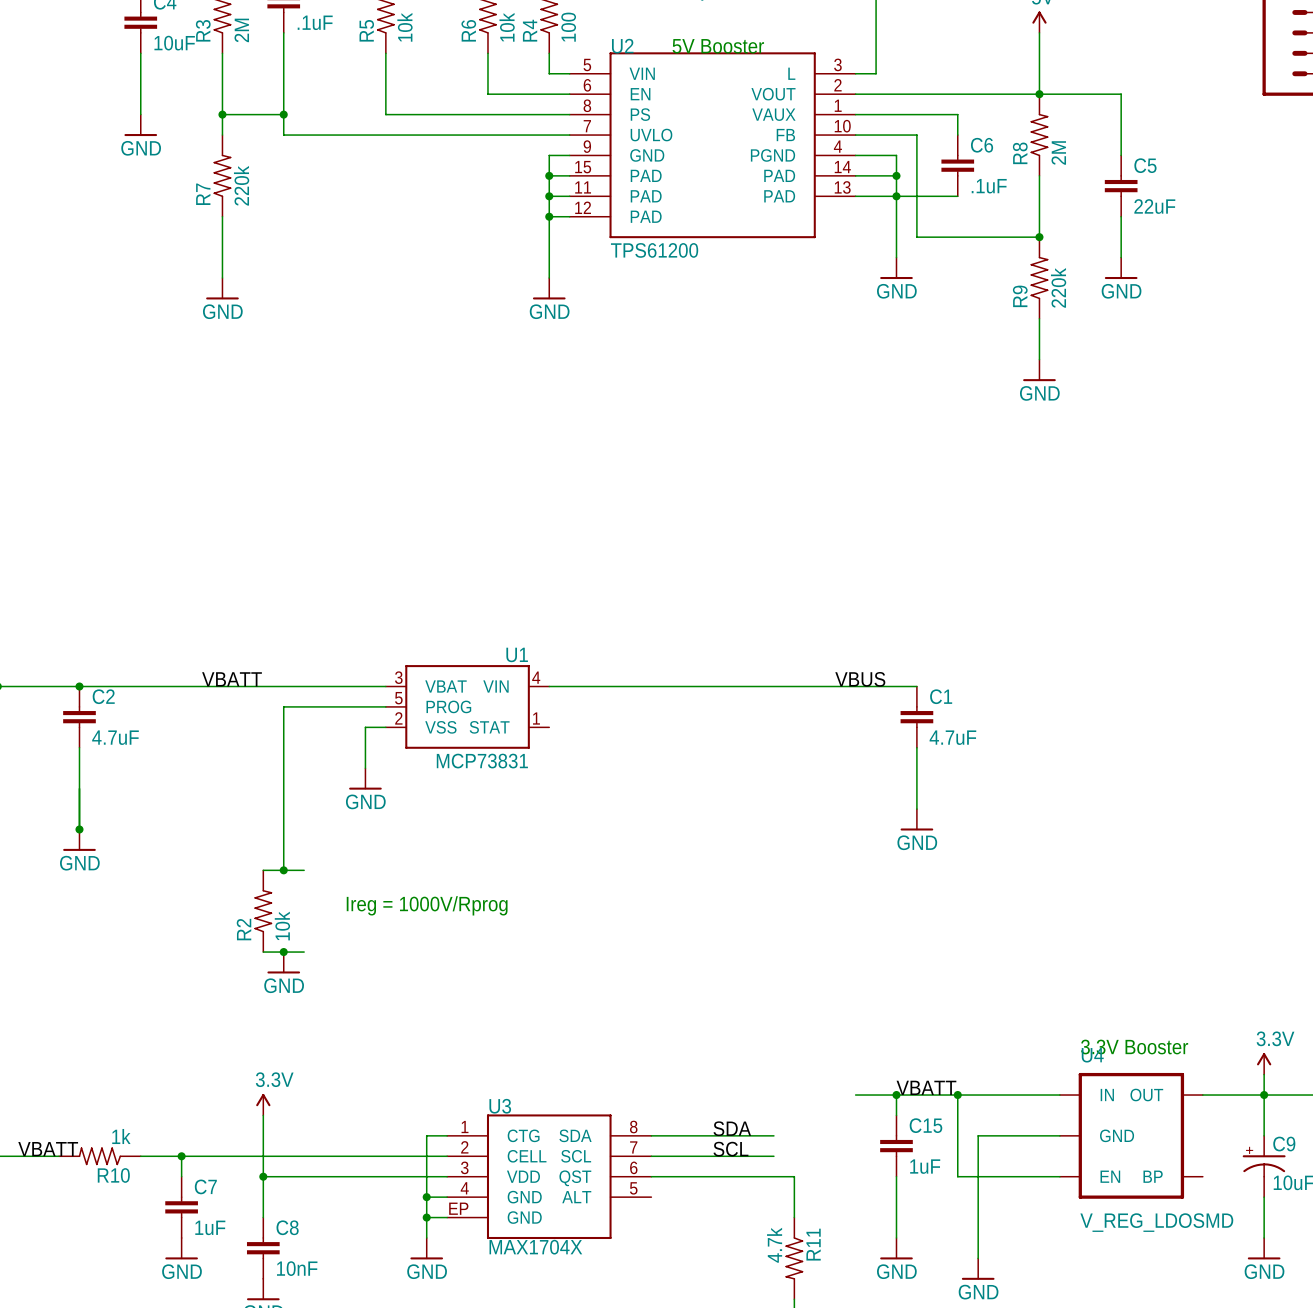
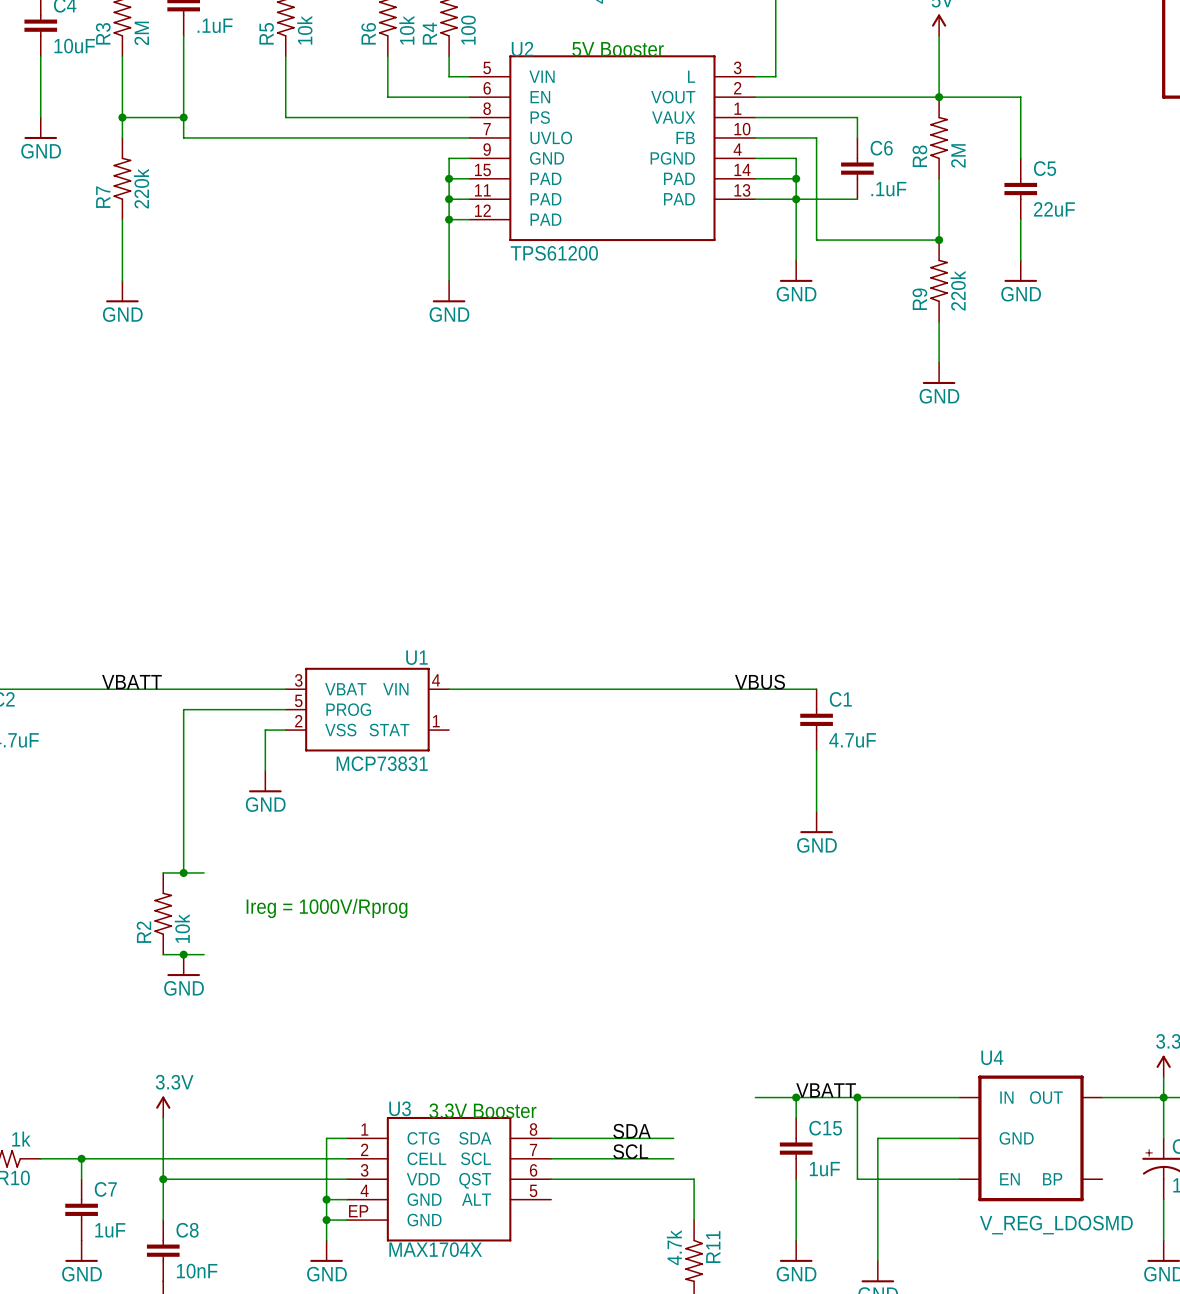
text: 3.3V Booster (1134, 1047) -> none
text: none -> 3.3V Booster (482, 1110)

